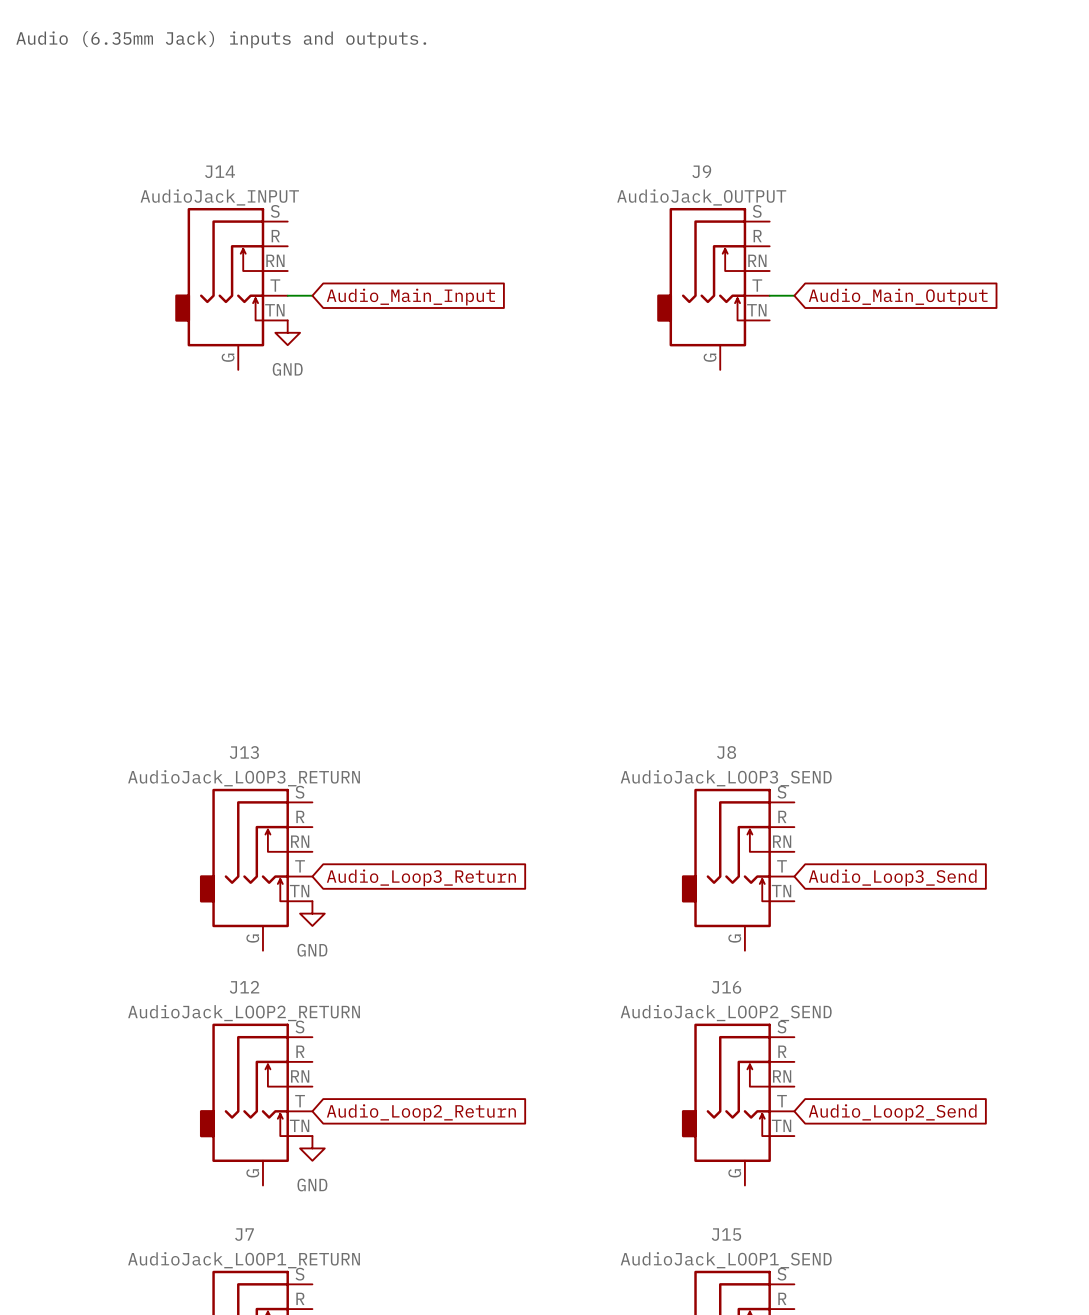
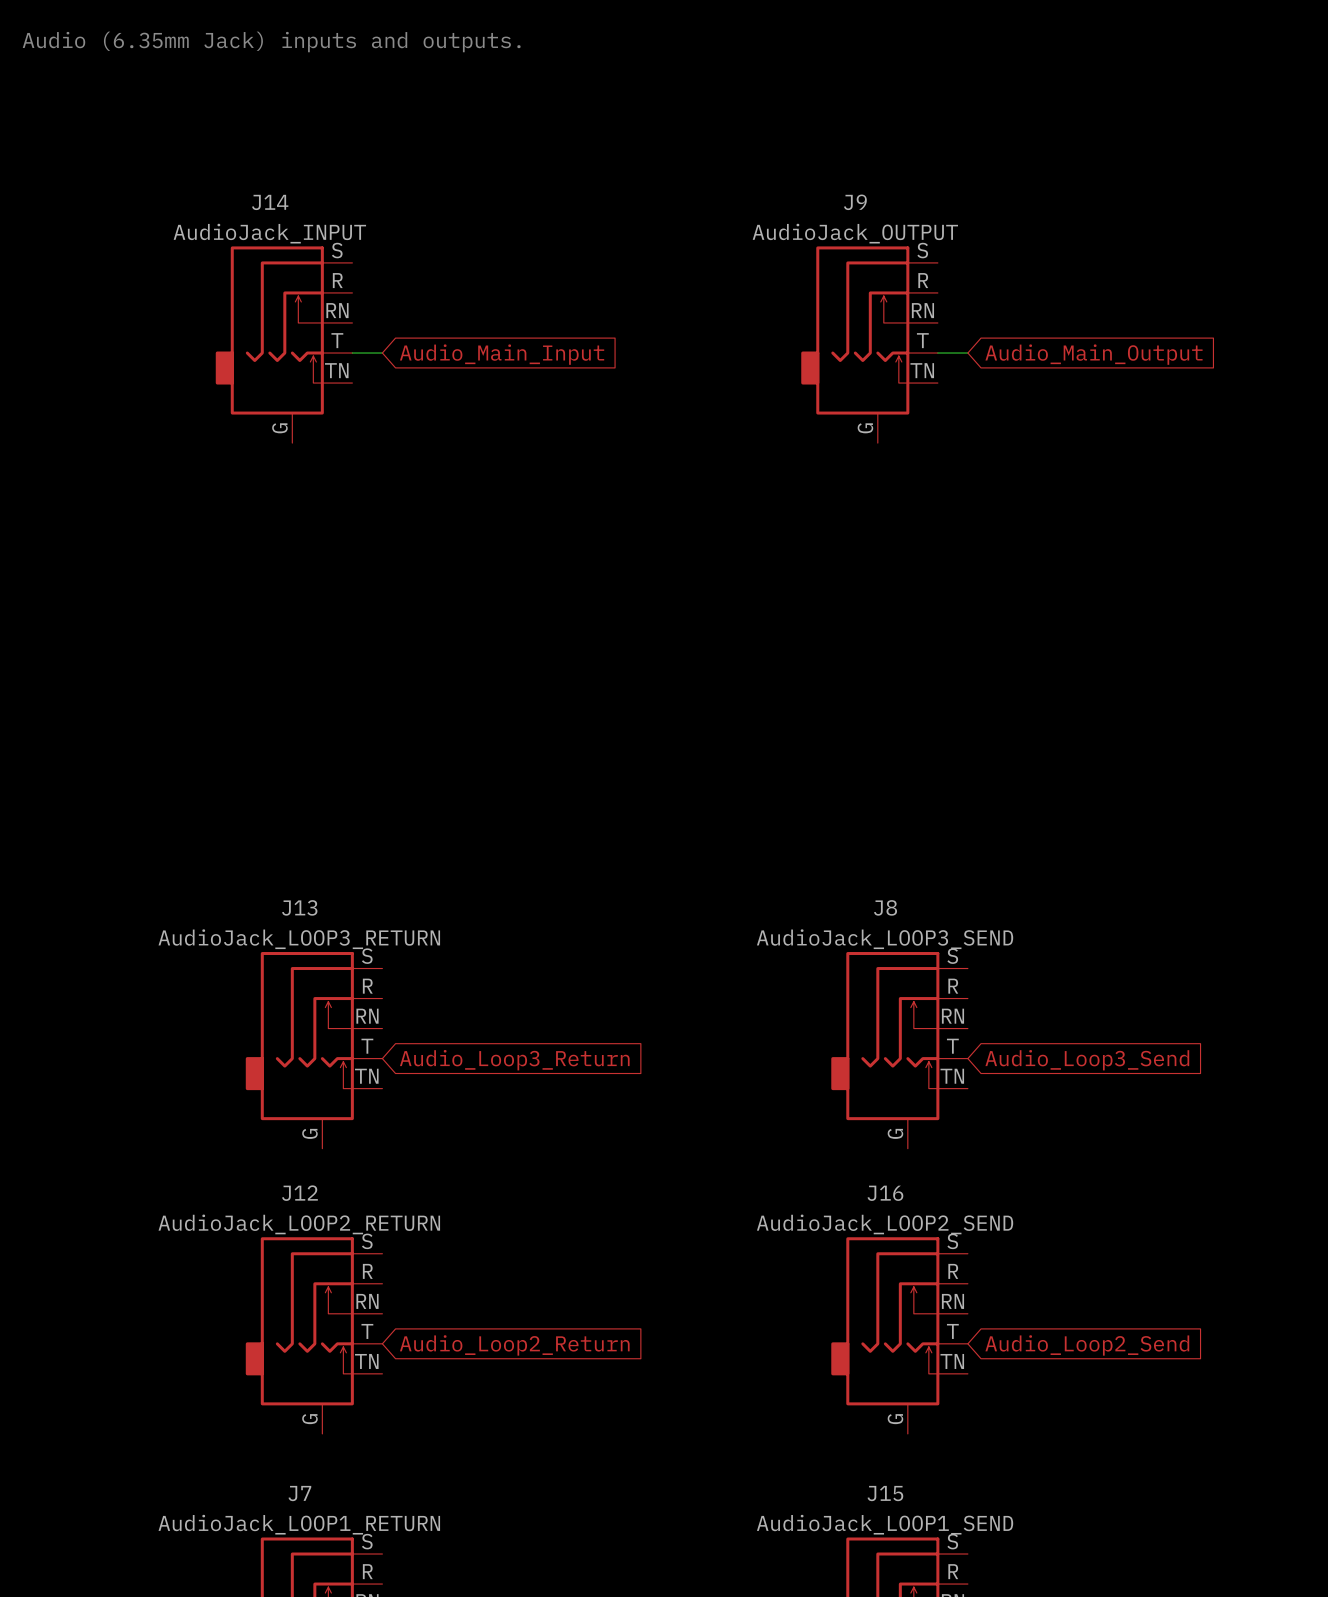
power symbol: GND (287, 332) -> none
power symbol: GND (312, 913) -> none
power symbol: GND (312, 1148) -> none

